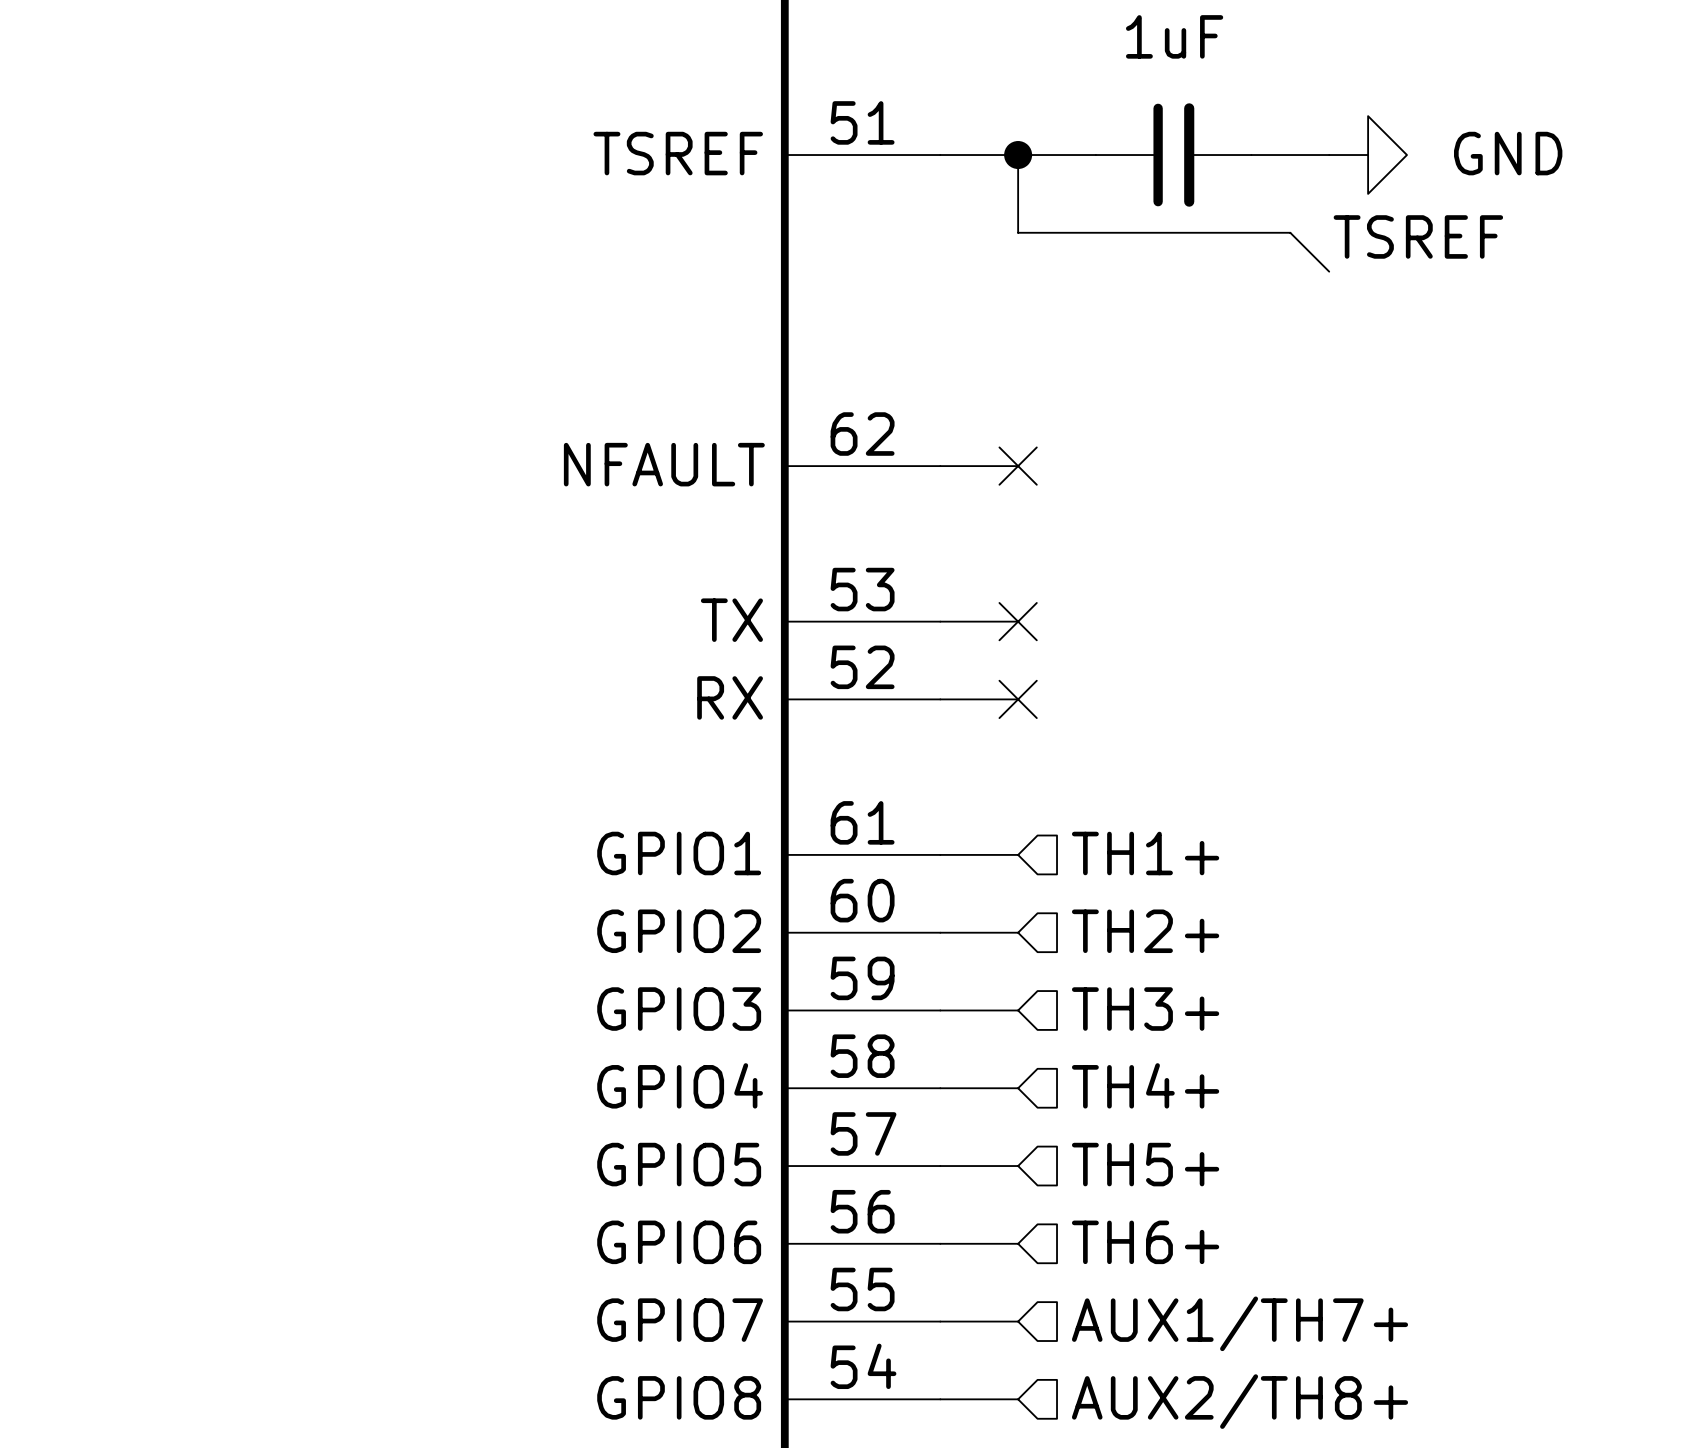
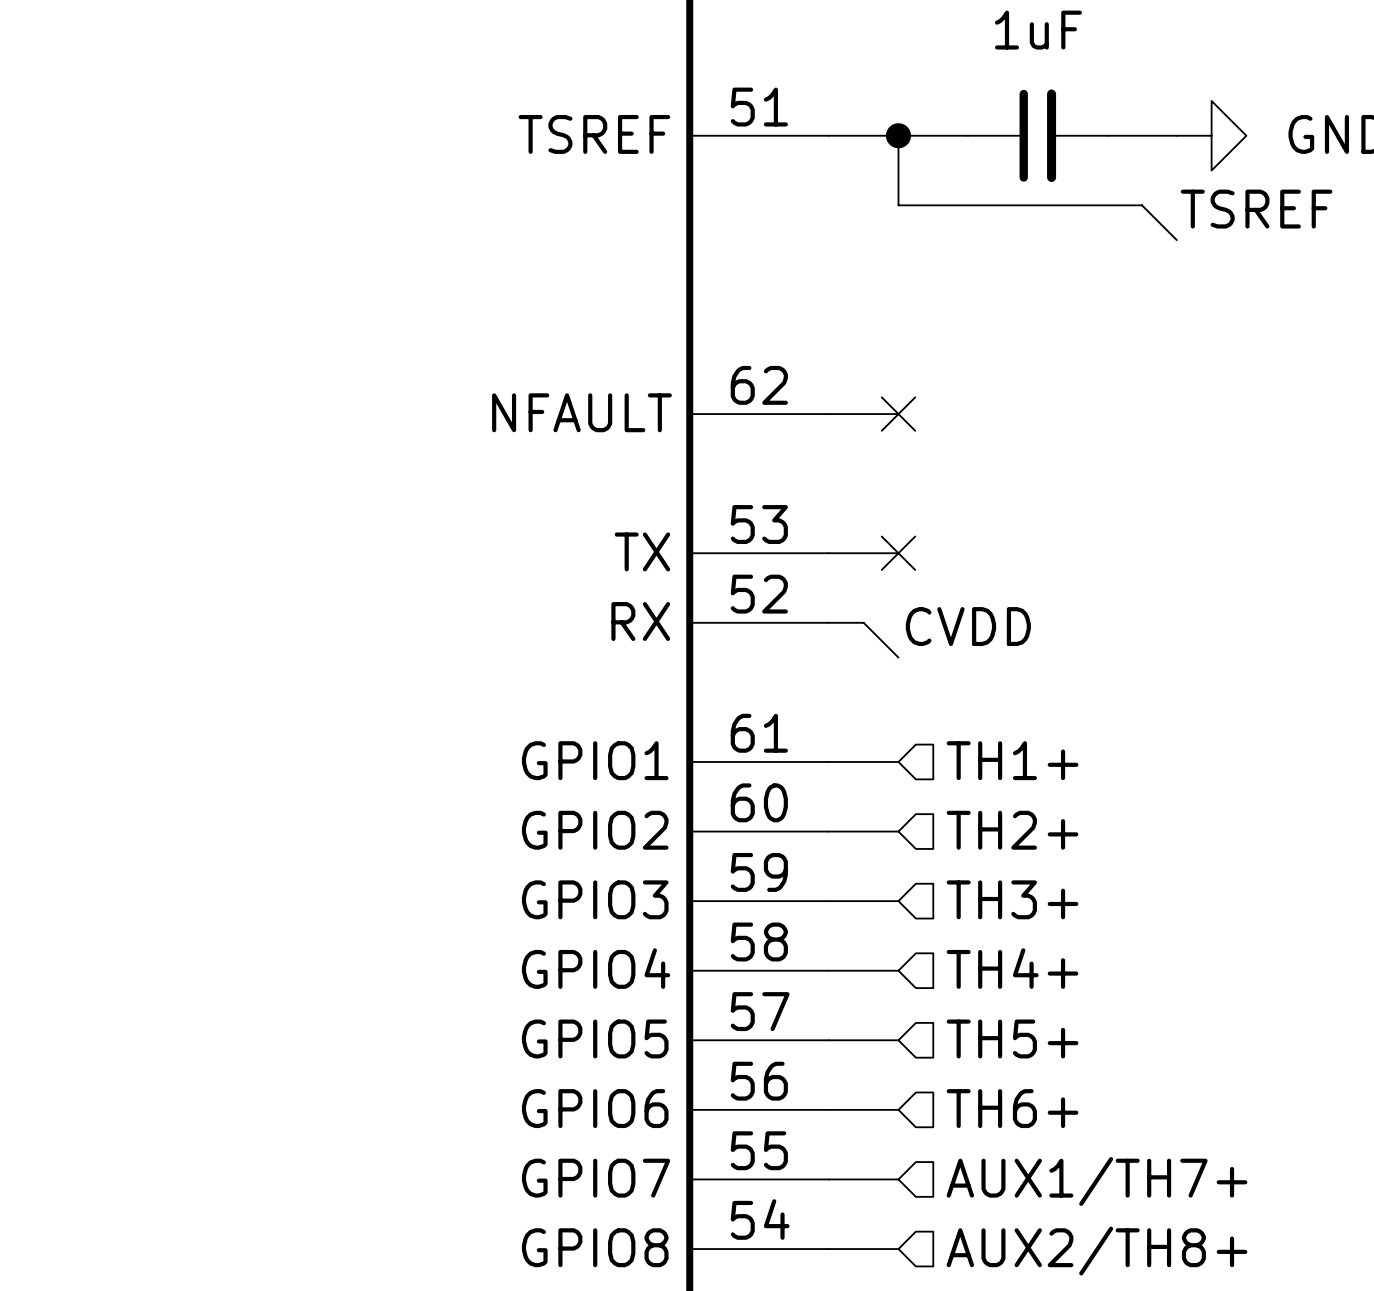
wire: (979, 699) (1018, 699) -> (863, 622) (898, 657)
no-connect mark: (1018, 699) -> none
label: none -> CVDD (968, 626)

